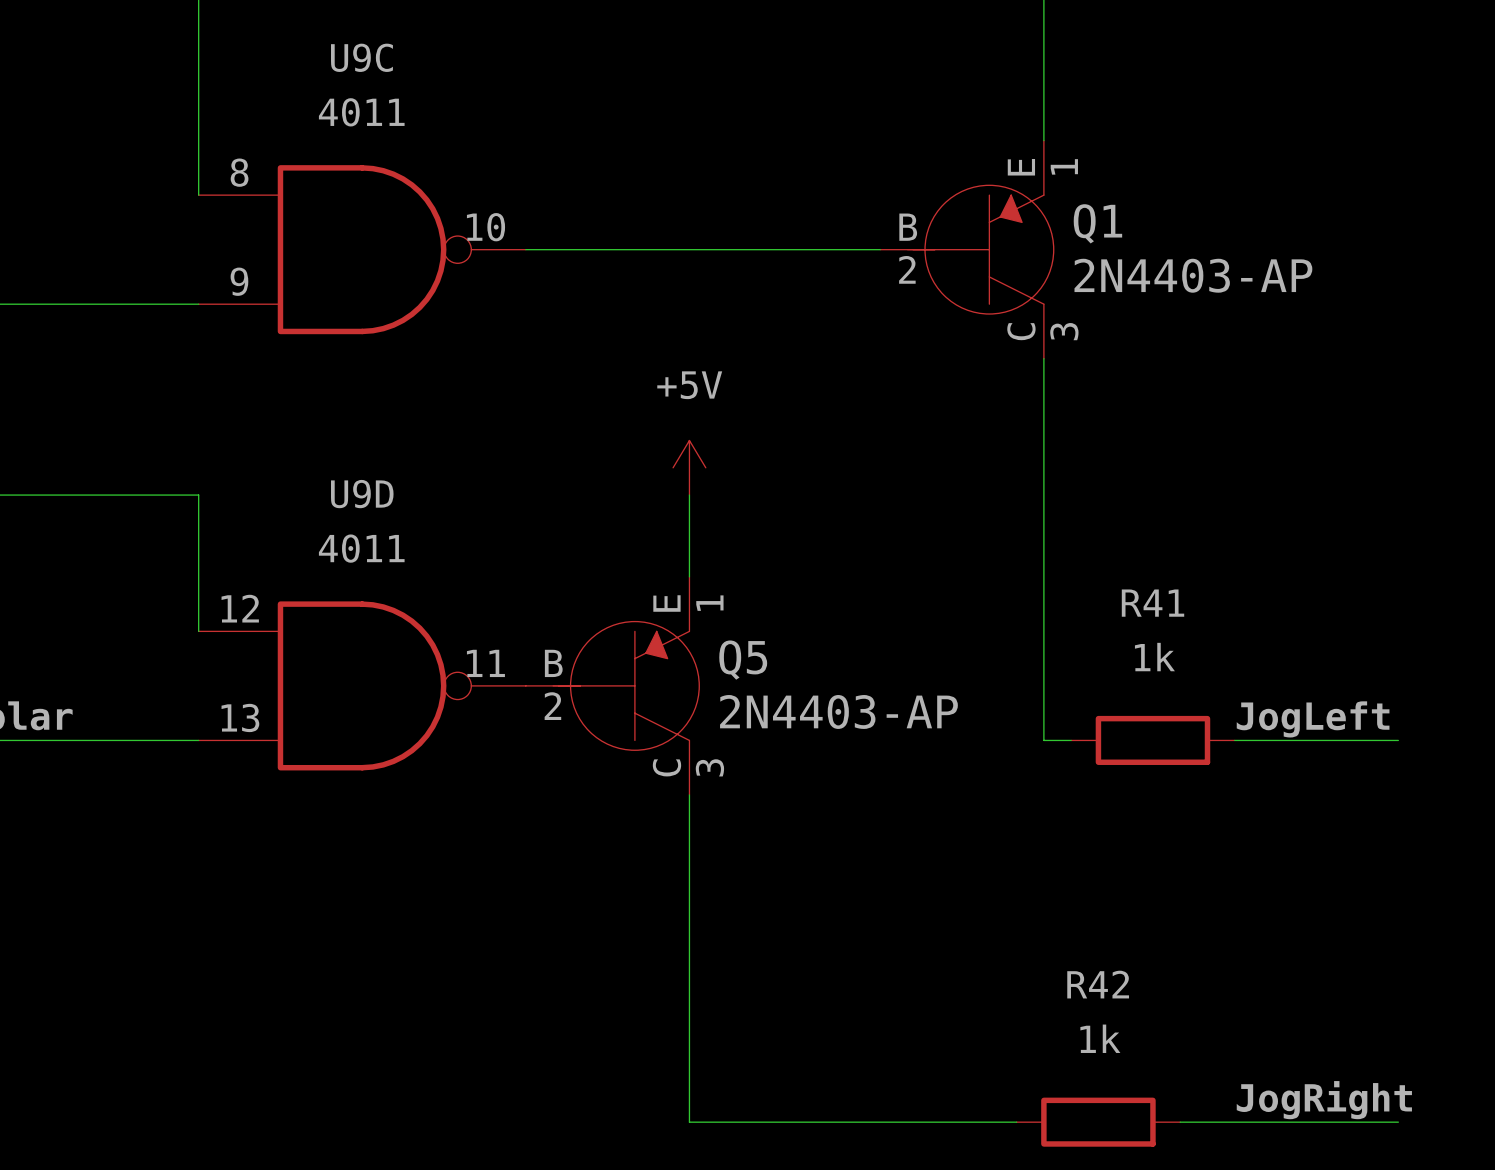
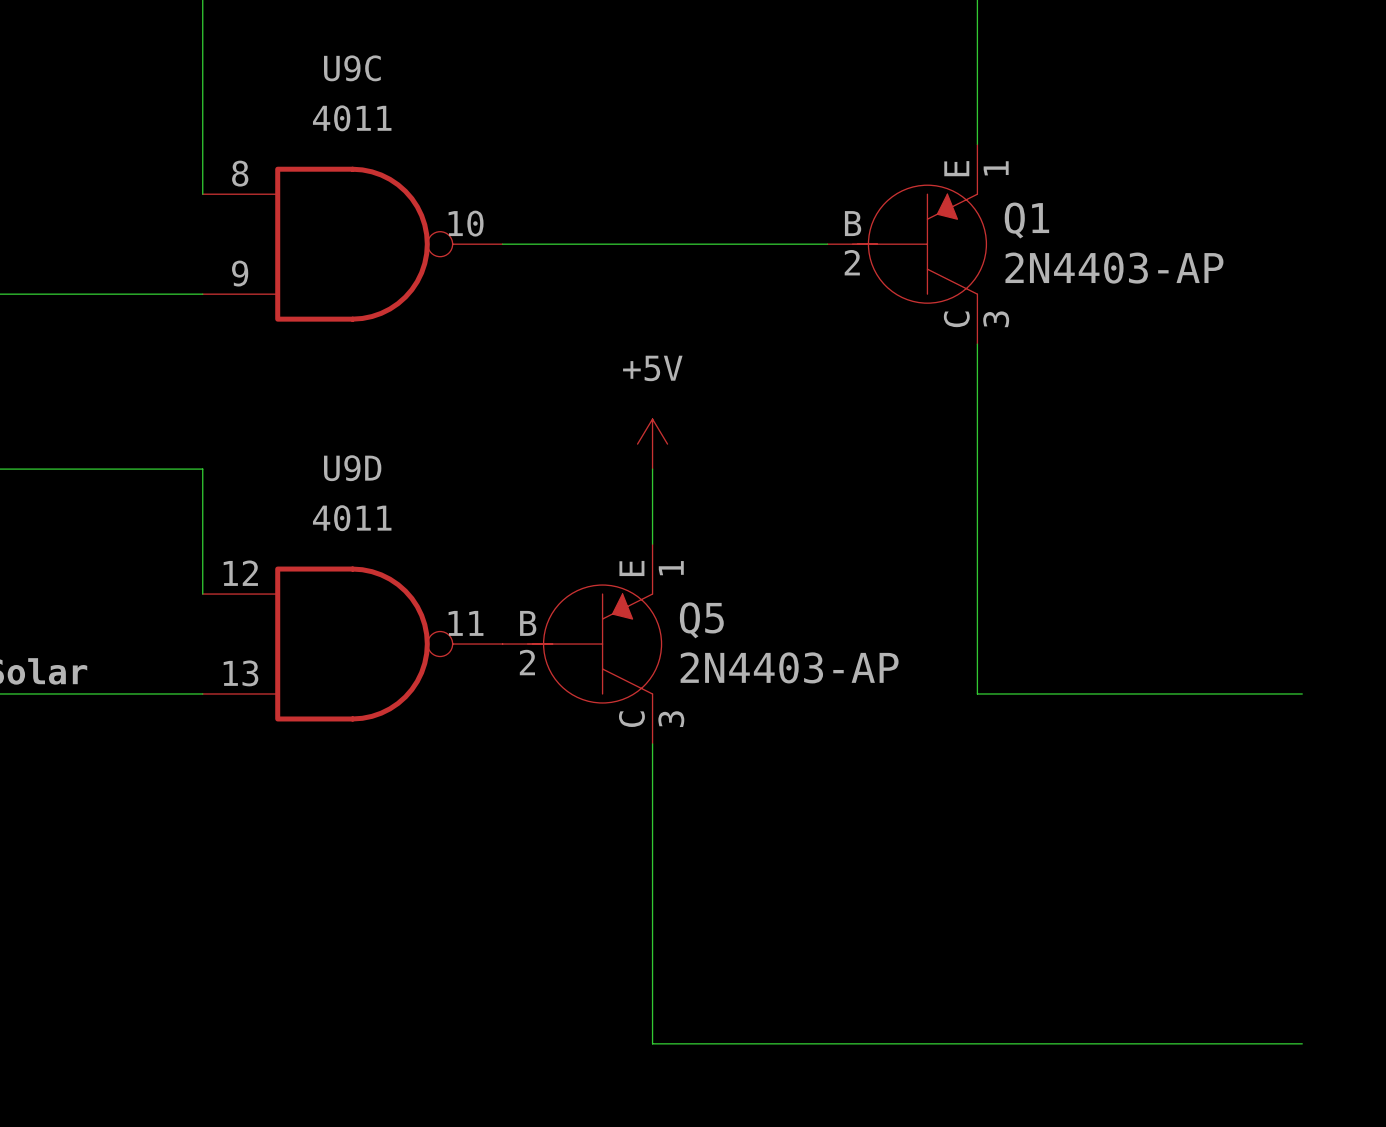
label: JogLeft (1313, 719) -> none
wire: none -> (1002, 693) (1152, 693)
R41: 1k (1152, 740) -> none
label: JogRight (1324, 1100) -> none
wire: none -> (952, 1043) (1102, 1043)
R42: 1k (1098, 1122) -> none

